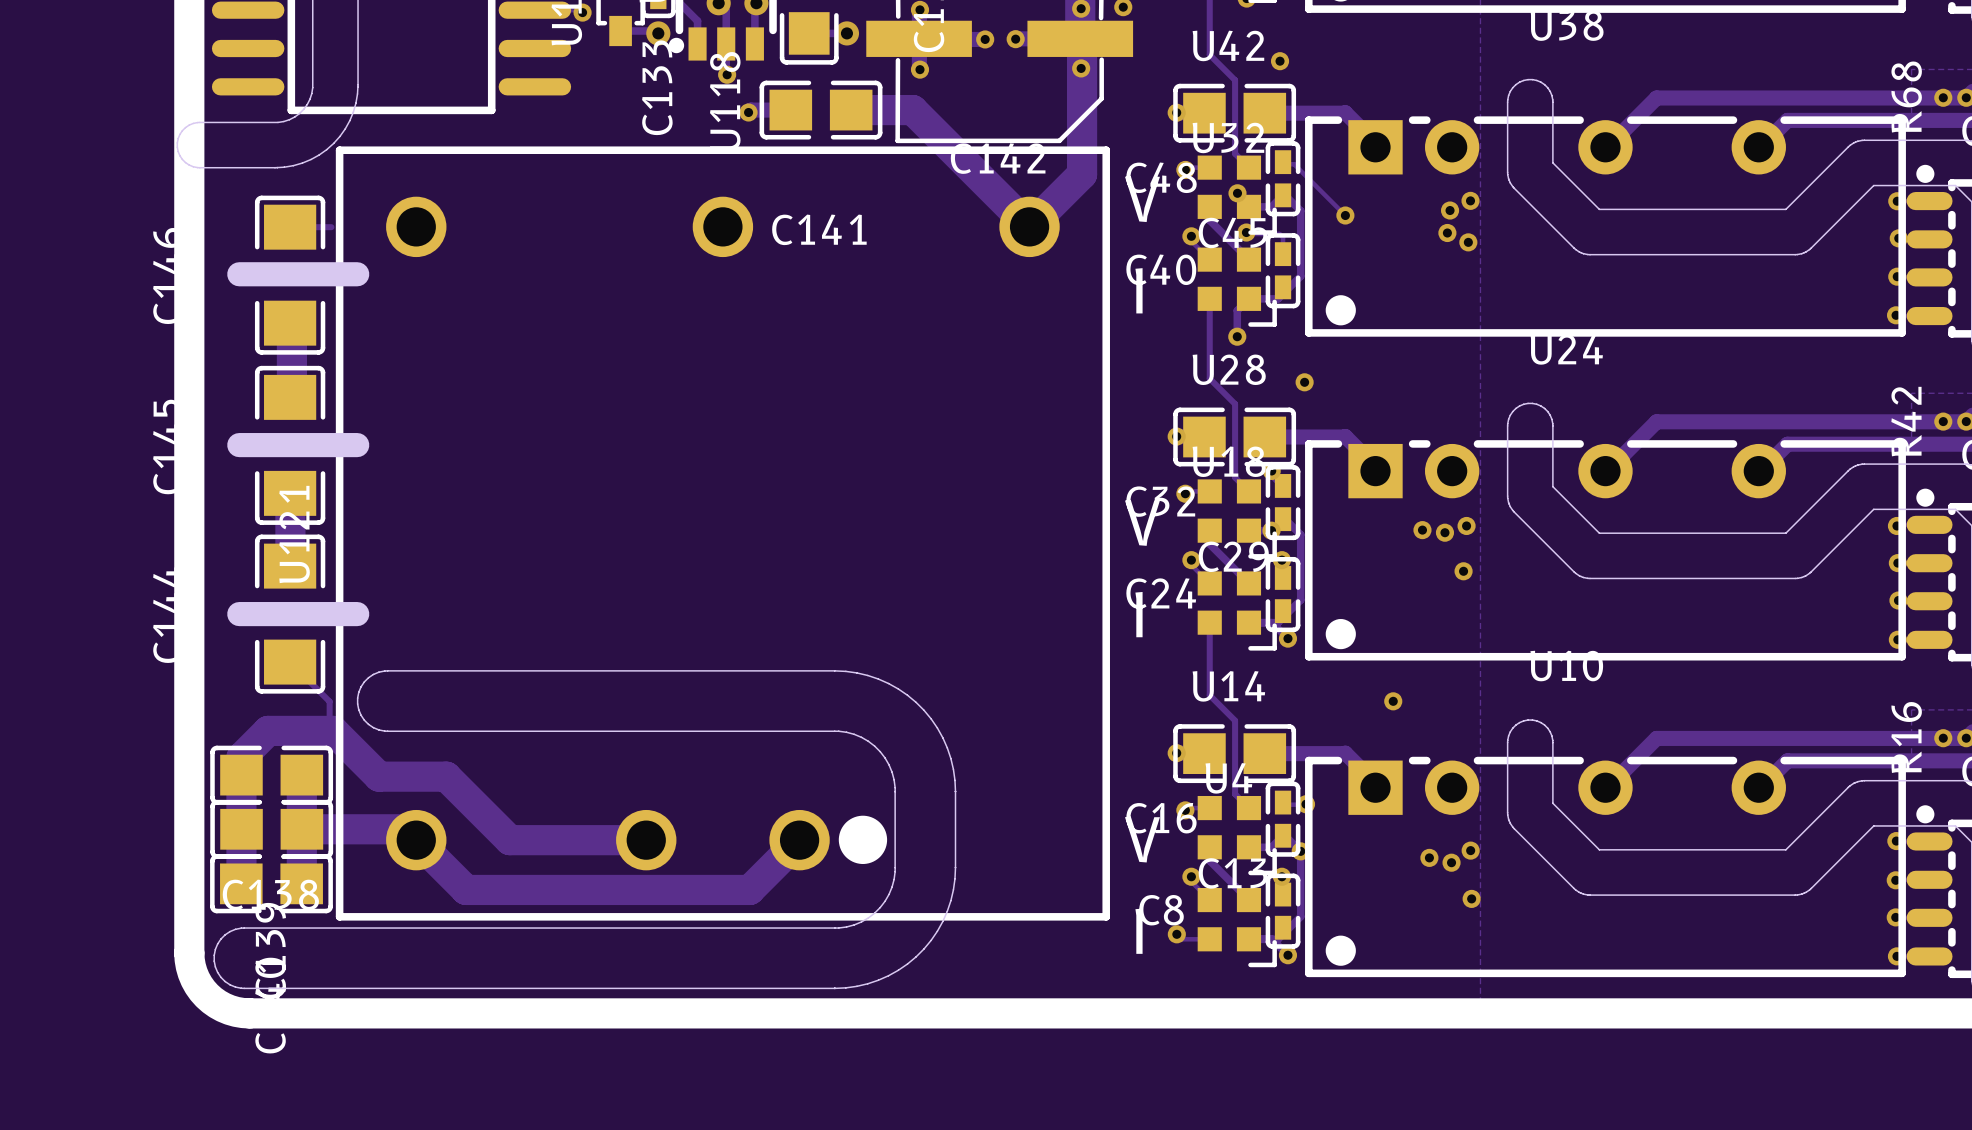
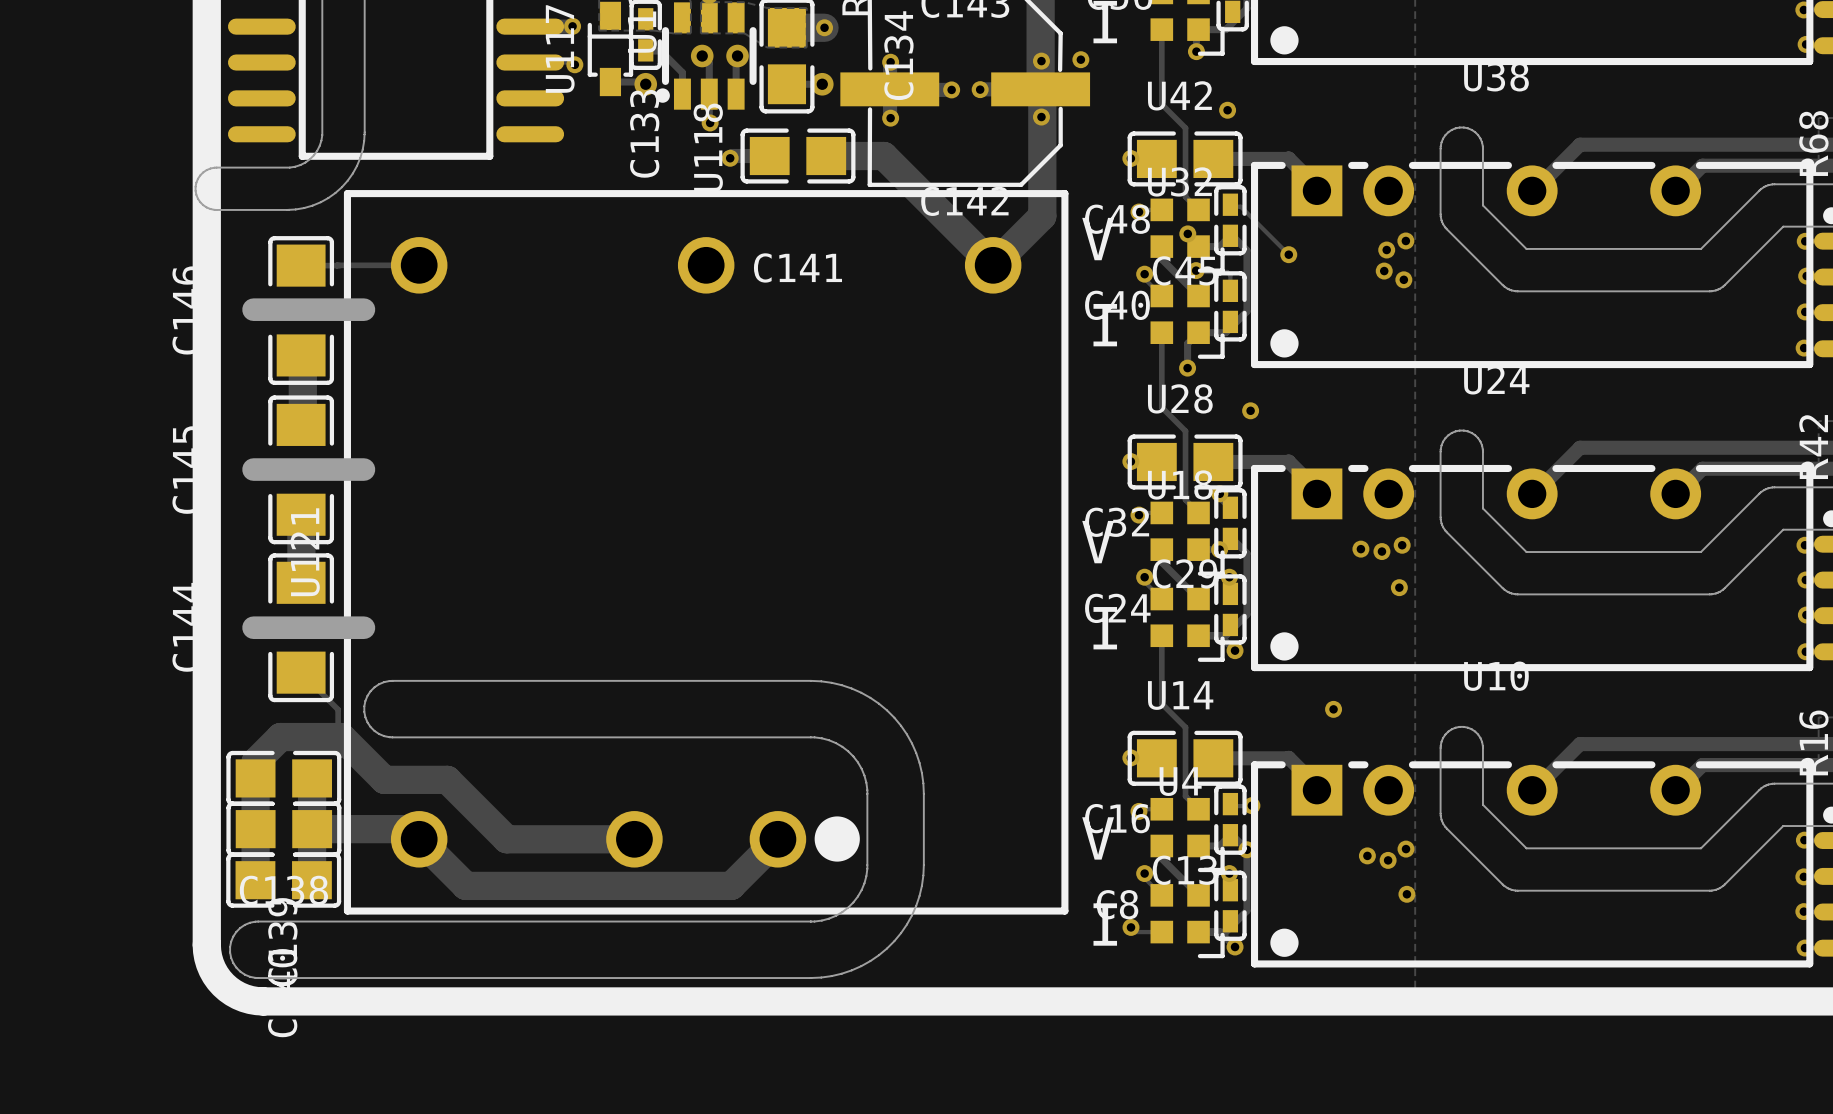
track: none -> (337, 265) (419, 265)

